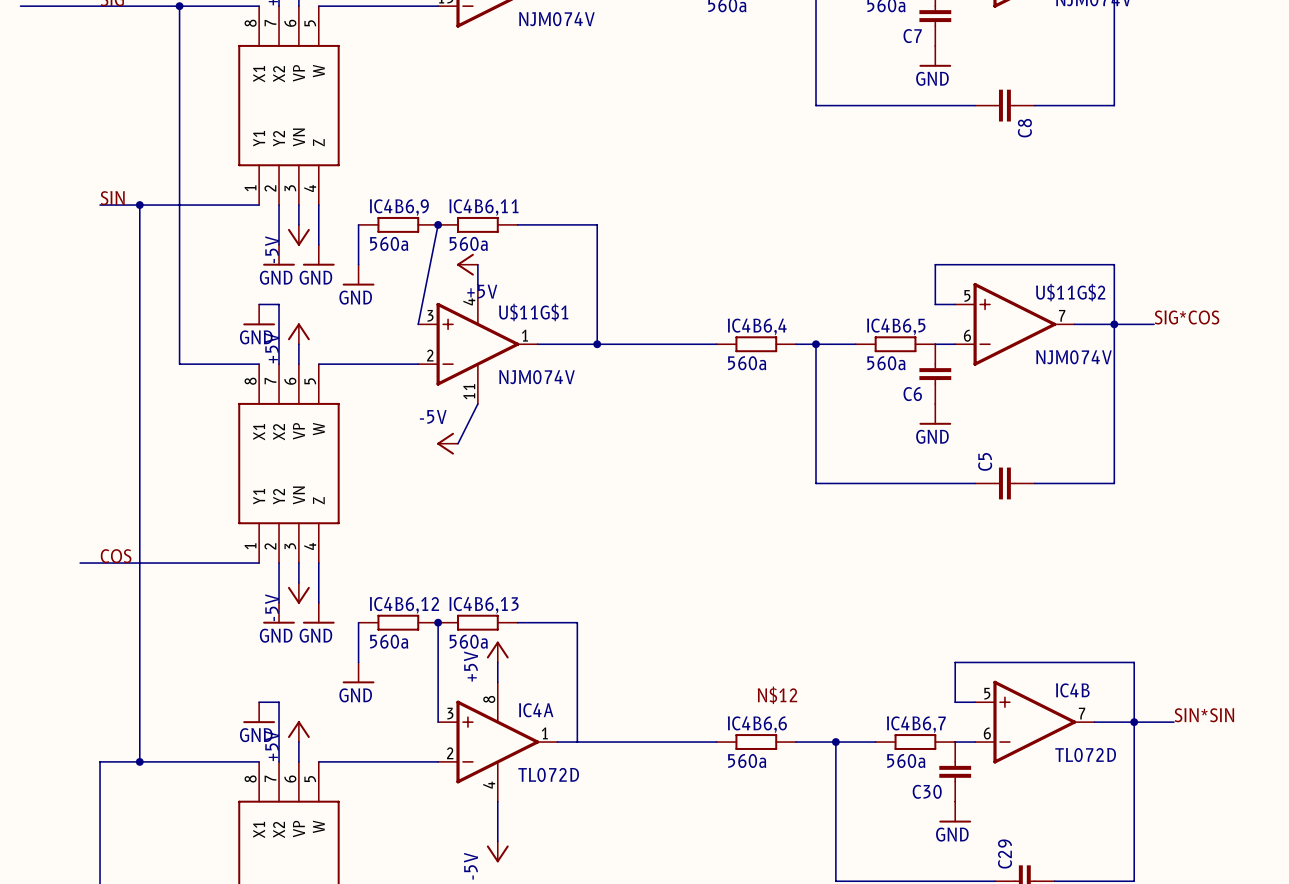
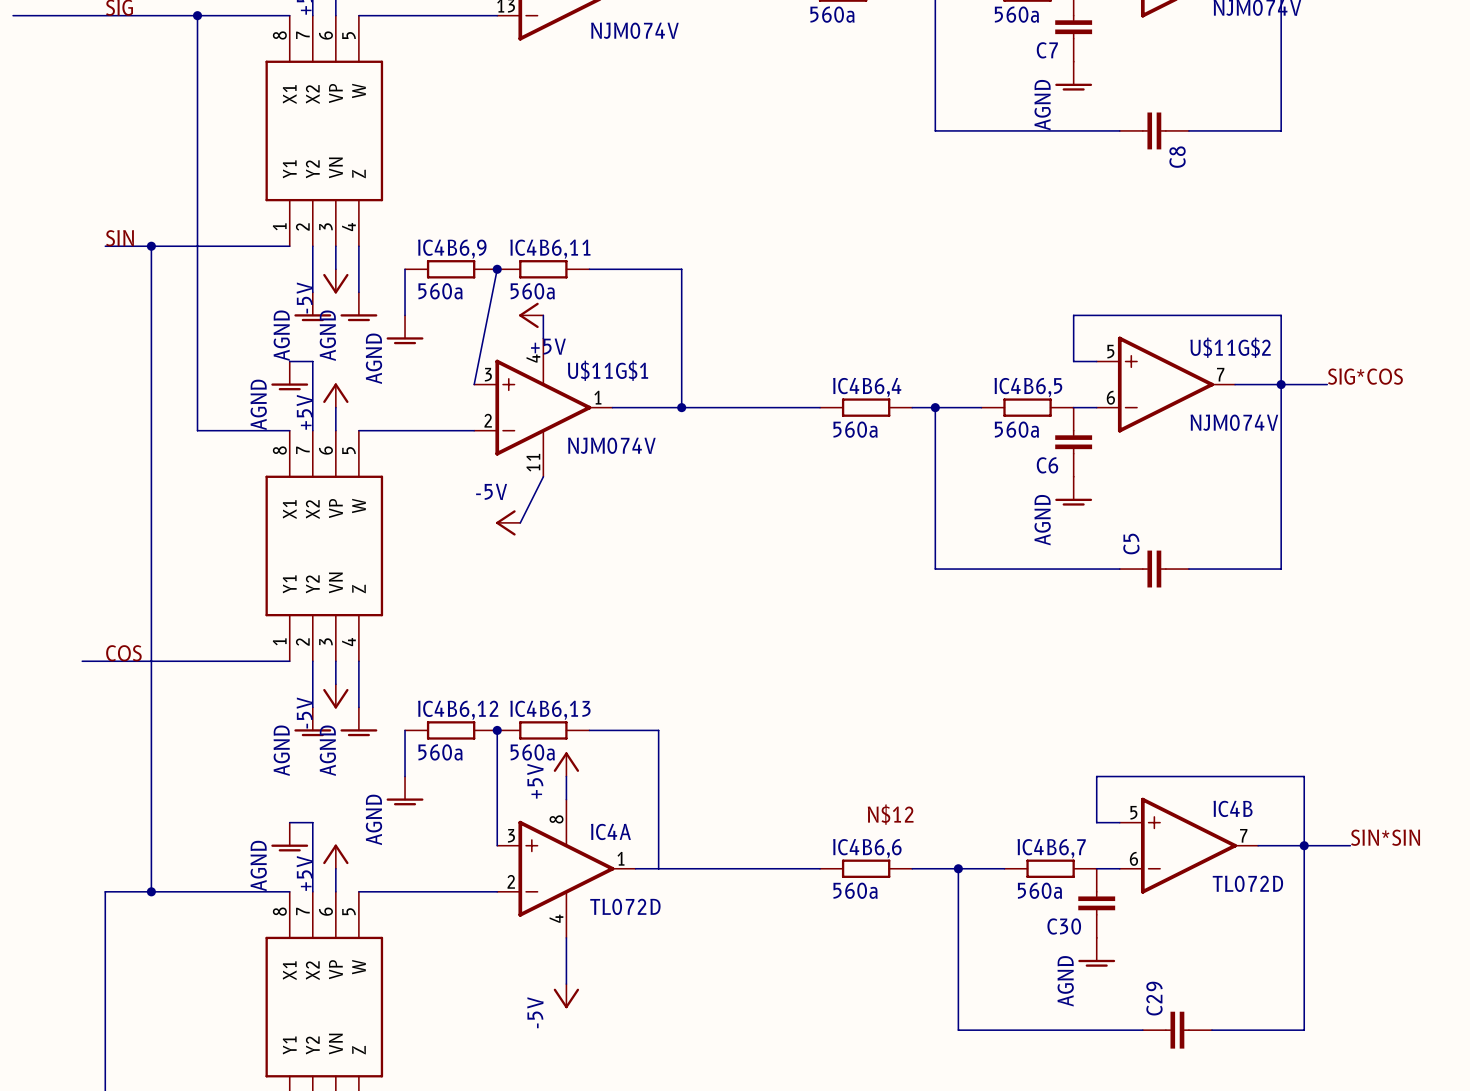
power symbol: GND (935, 56) -> AGND (1073, 76)
power symbol: GND (279, 255) -> AGND (312, 306)
power symbol: GND (318, 255) -> AGND (358, 306)
power symbol: GND (358, 275) -> AGND (405, 329)
power symbol: GND (259, 314) -> AGND (289, 375)
power symbol: GND (935, 414) -> AGND (1073, 491)
power symbol: GND (279, 613) -> AGND (312, 721)
power symbol: GND (318, 613) -> AGND (358, 721)
power symbol: GND (358, 672) -> AGND (405, 790)
power symbol: GND (259, 712) -> AGND (289, 837)
power symbol: GND (955, 812) -> AGND (1096, 952)

